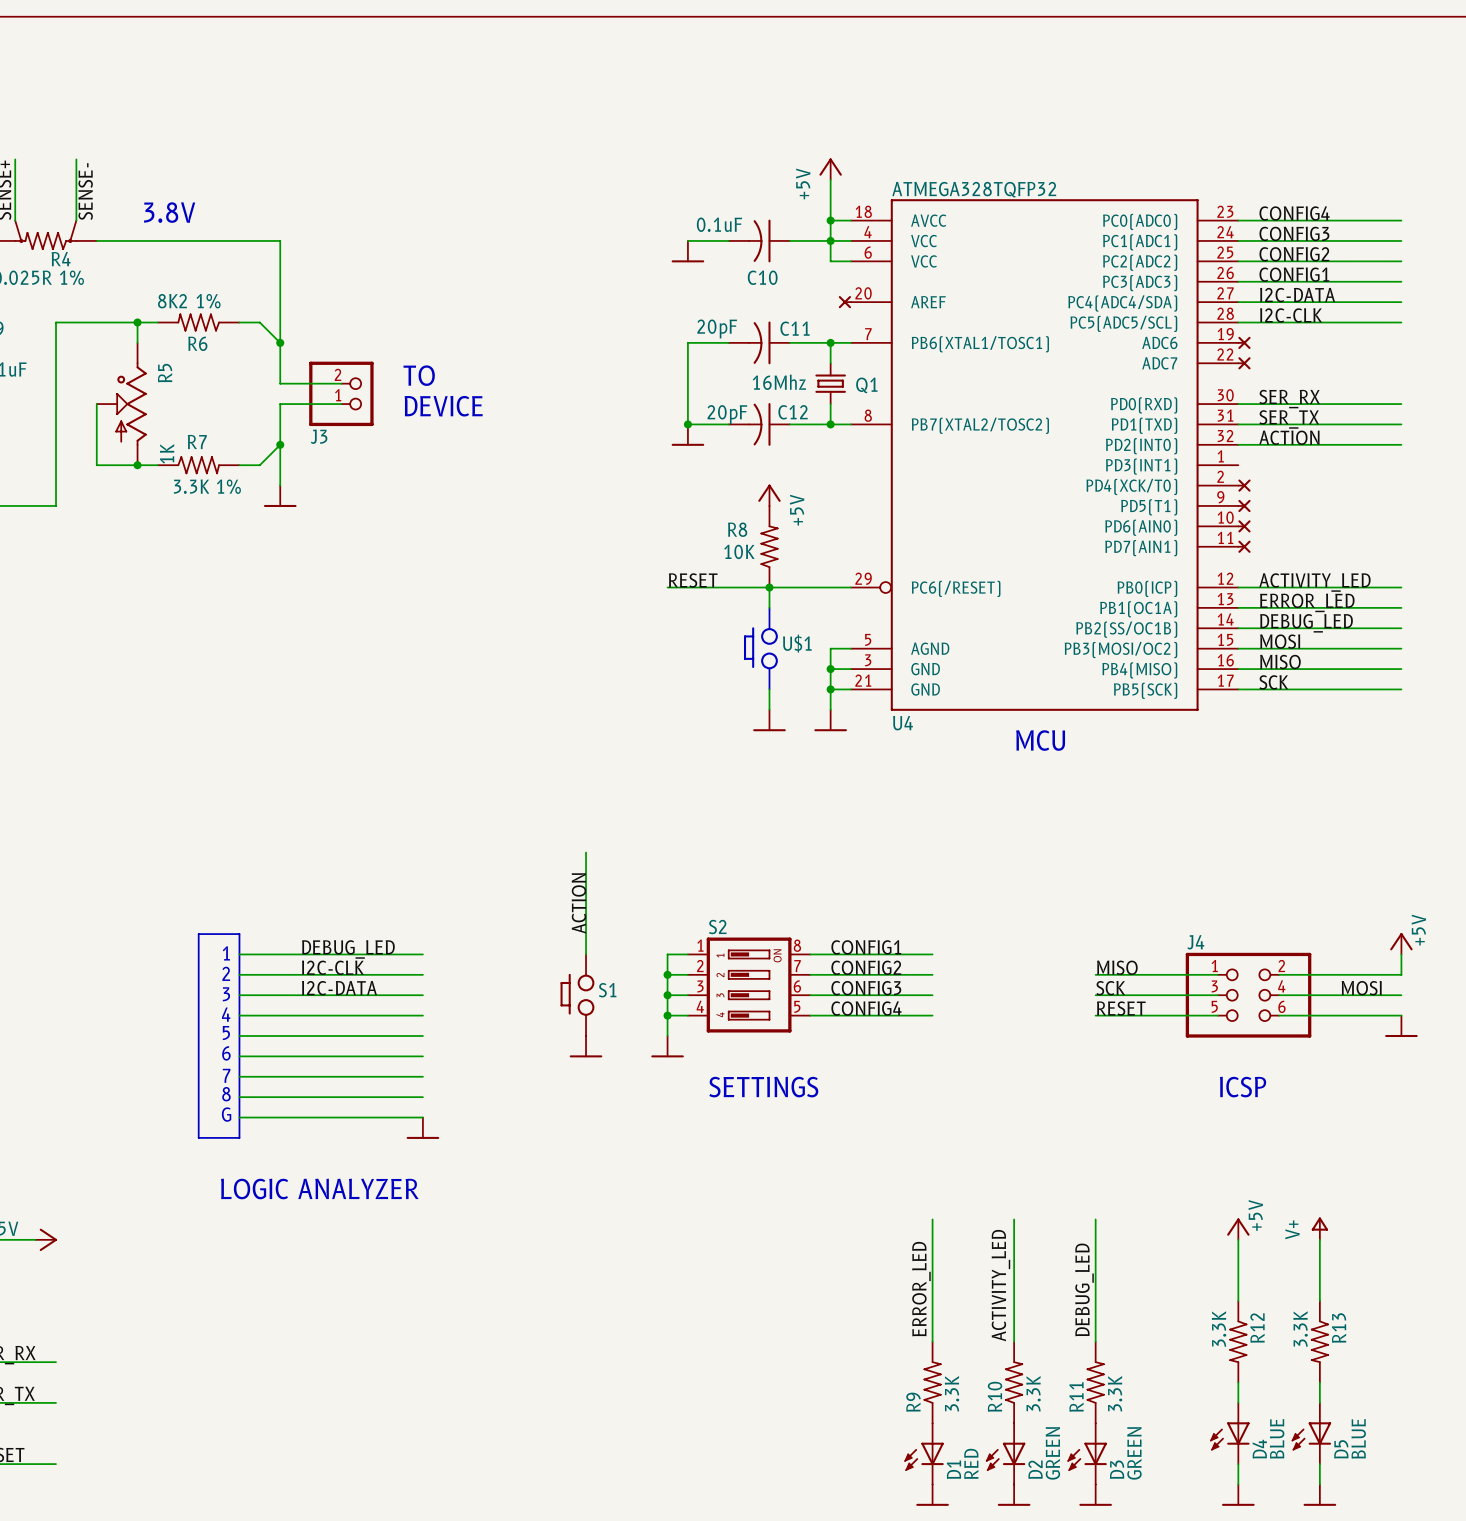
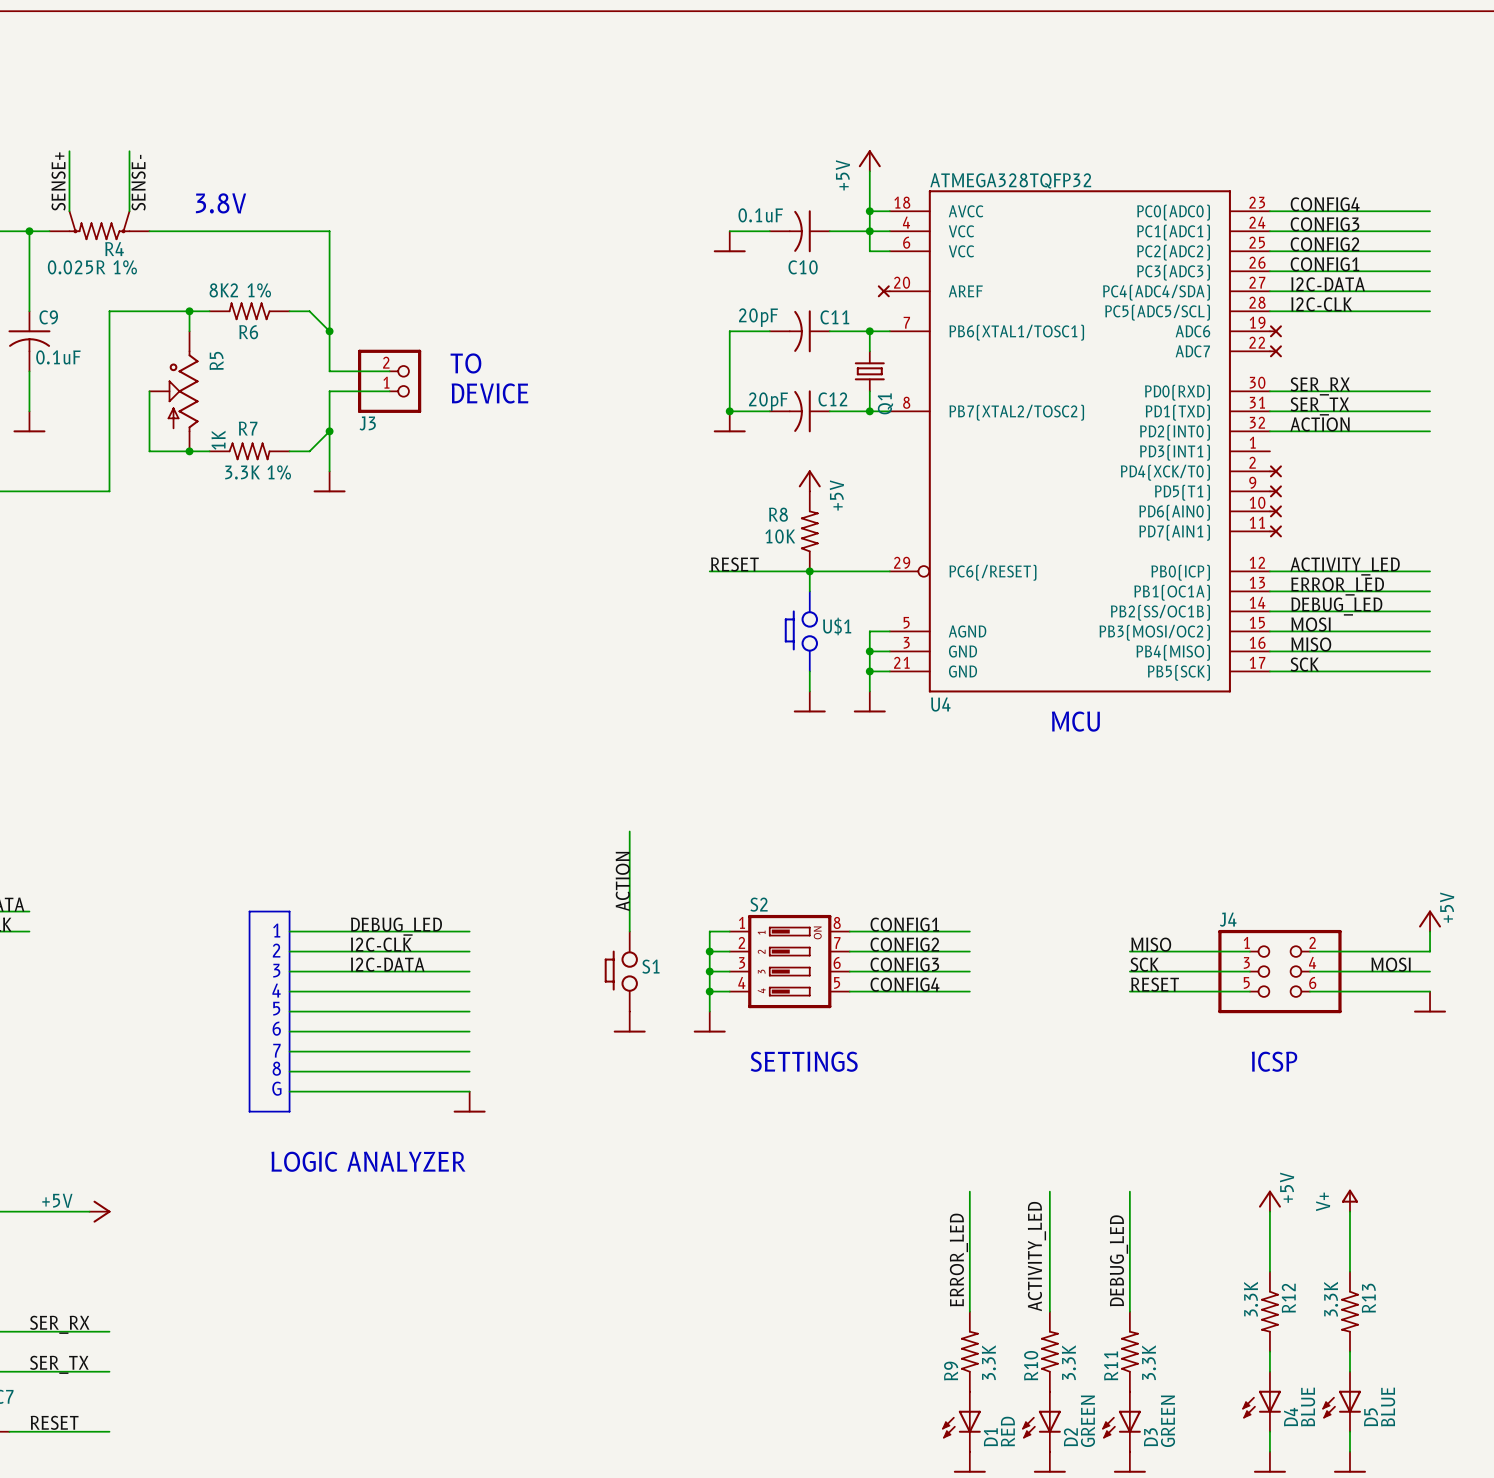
Q1 value: 16Mhz (779, 382) -> none
Q1 name rotation: 0° (866, 385) -> 90° counterclockwise (885, 403)
Q1 name position: Q1 (866, 385) -> Q1 (885, 403)

